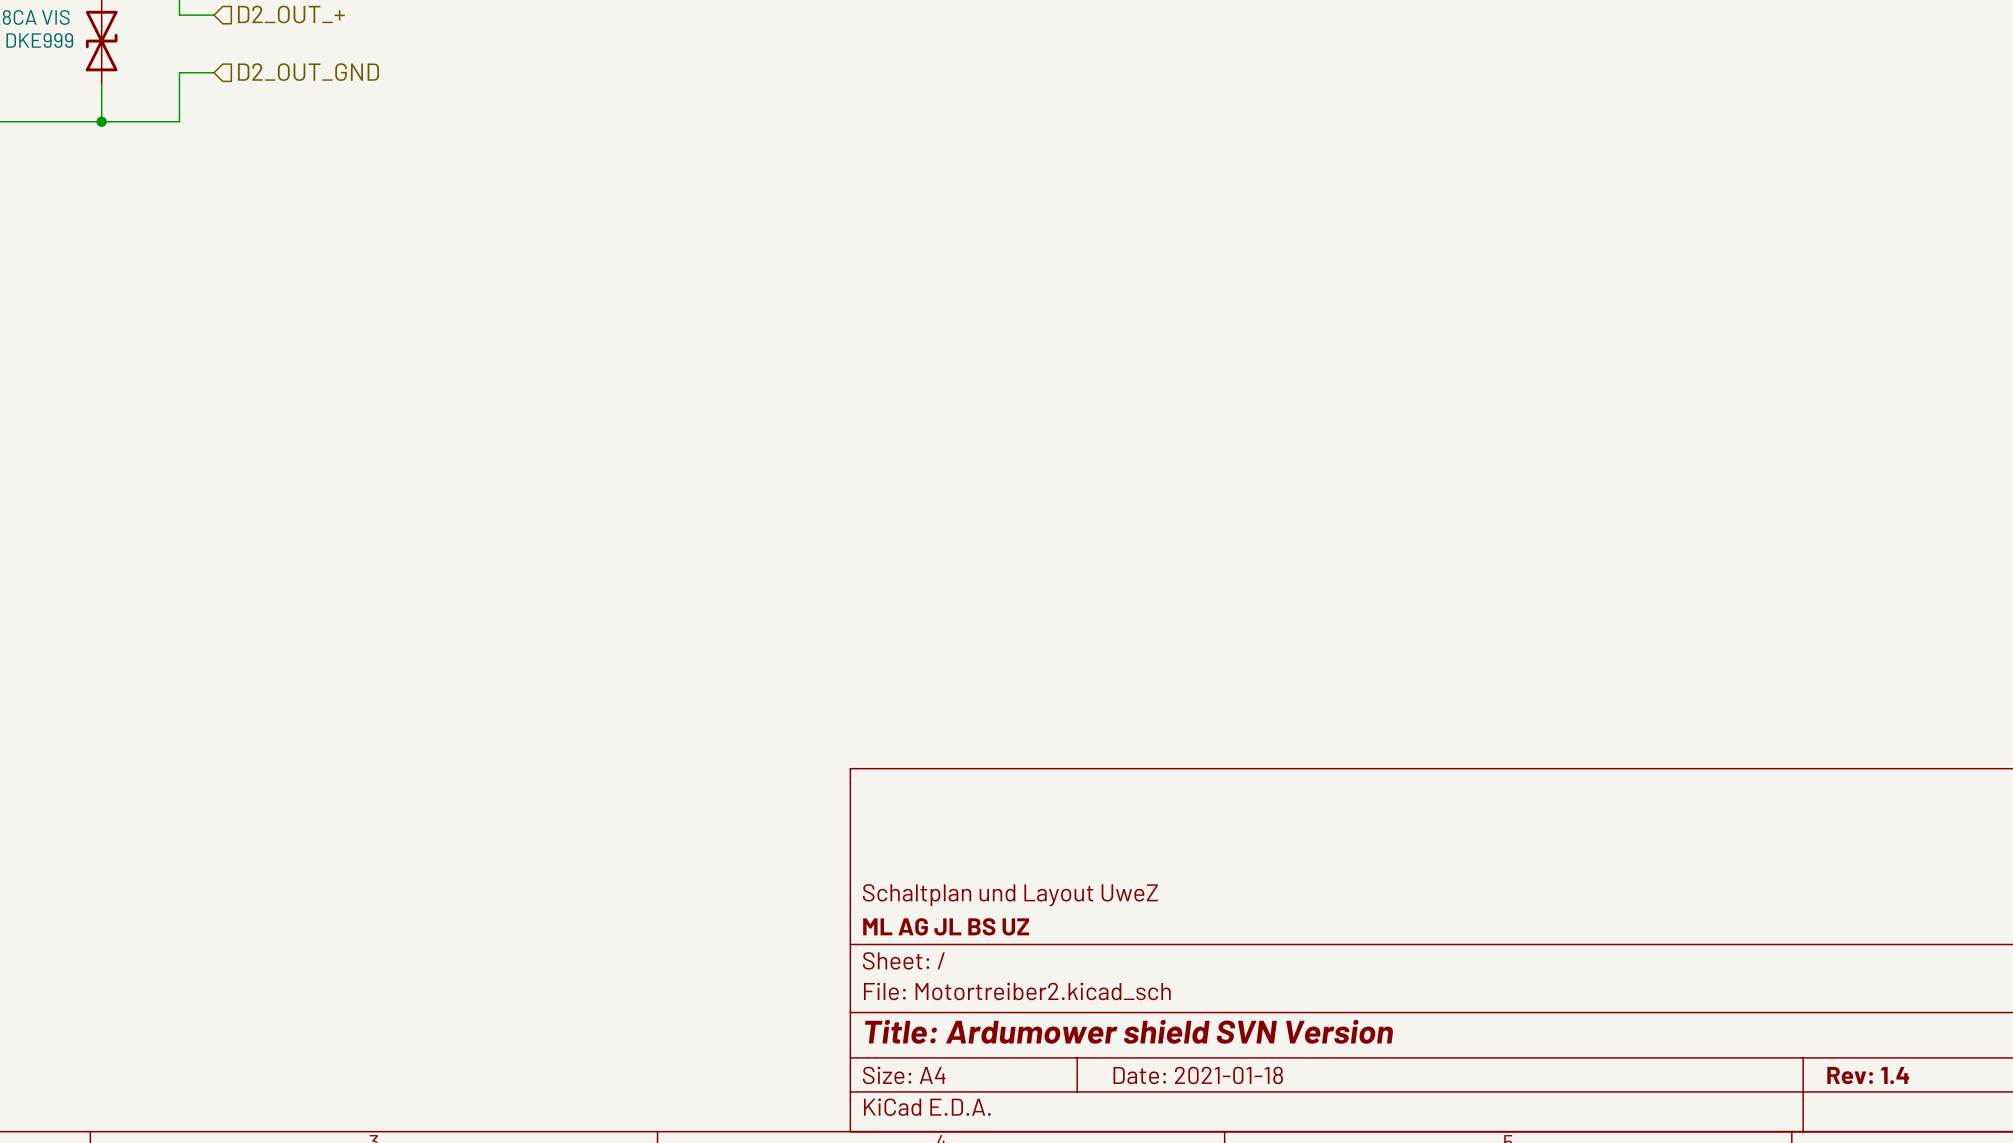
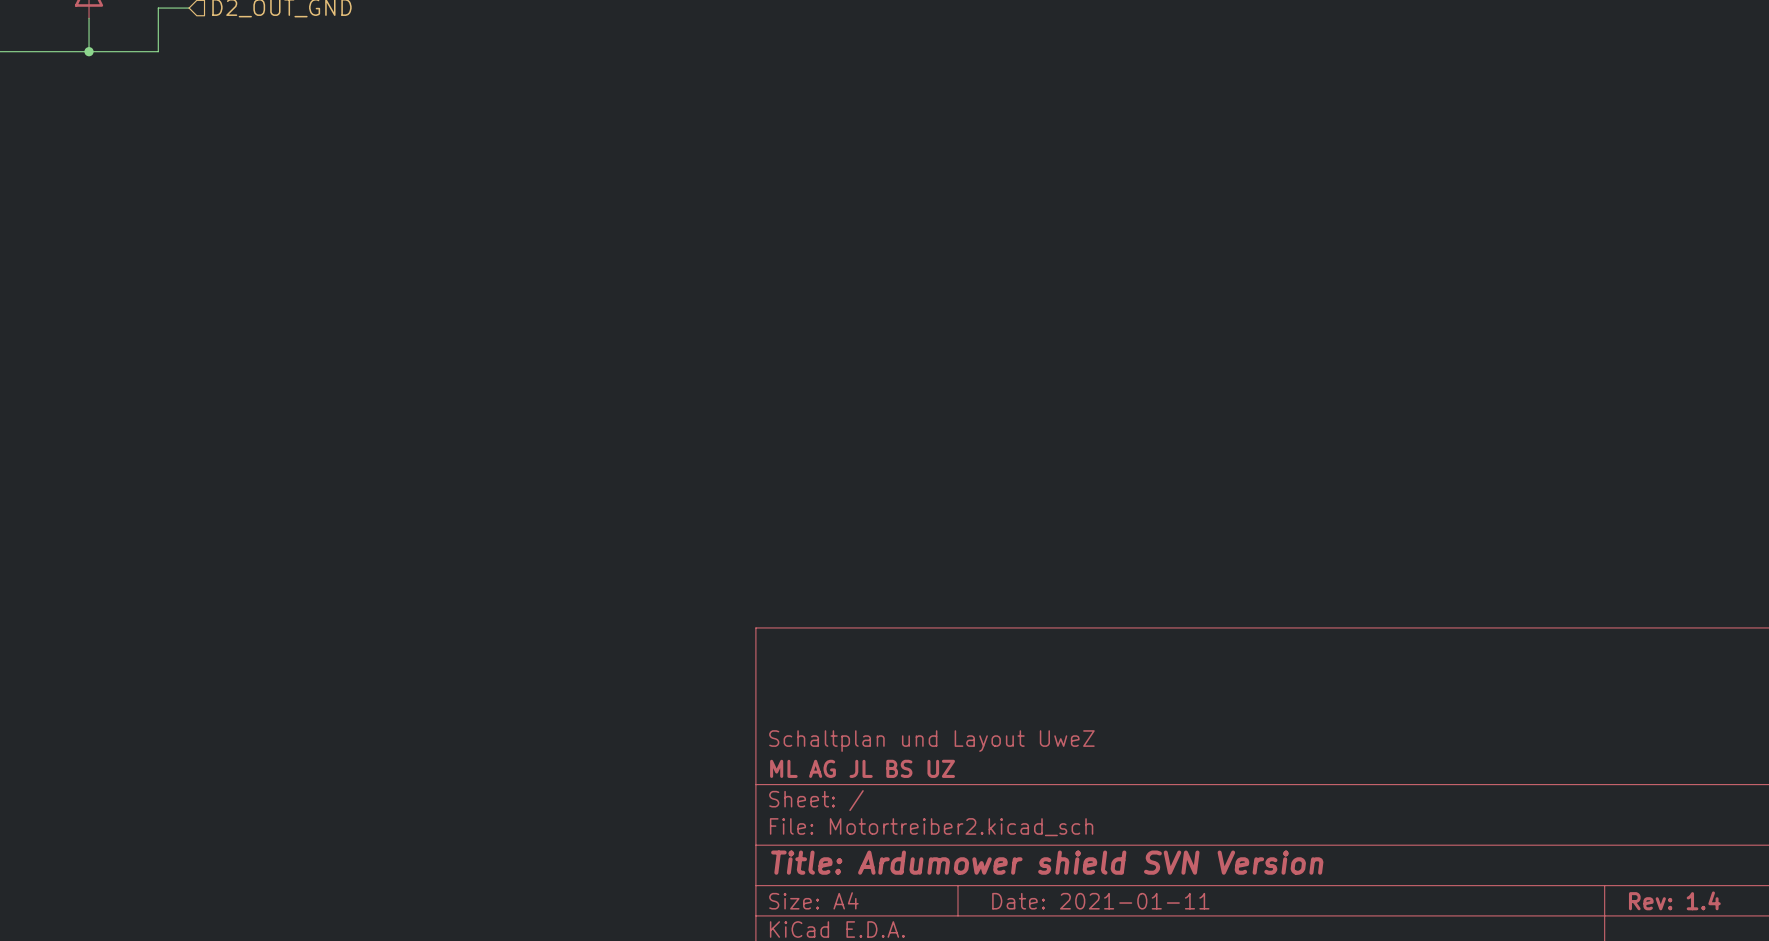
title block: Date: 2021-01-18 (1198, 1075) -> Date: 2021-01-11 (1100, 901)

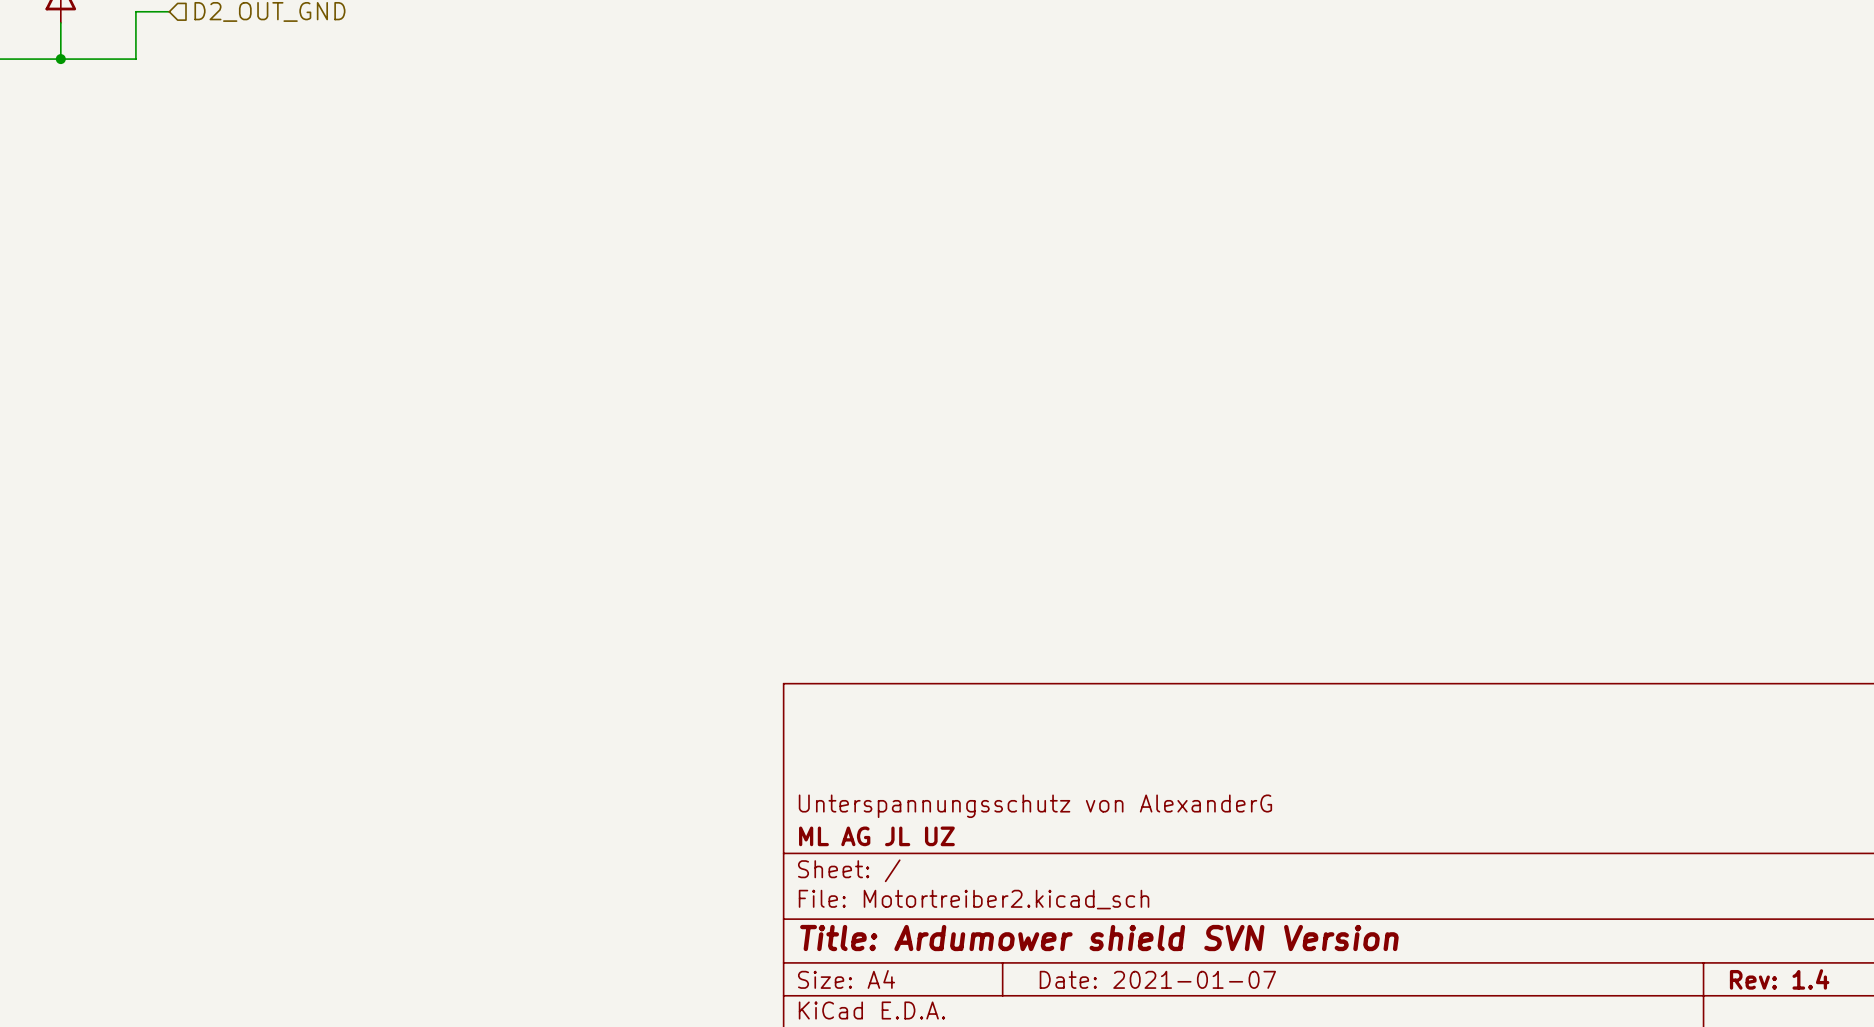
title block: Schaltplan und Layout UweZ (931, 741) -> Unterspannungsschutz von AlexanderG (1035, 806)
title block: ML AG JL BS UZ (862, 768) -> ML AG JL UZ (876, 836)
title block: Date: 2021-01-11 (1100, 901) -> Date: 2021-01-07 (1157, 979)

